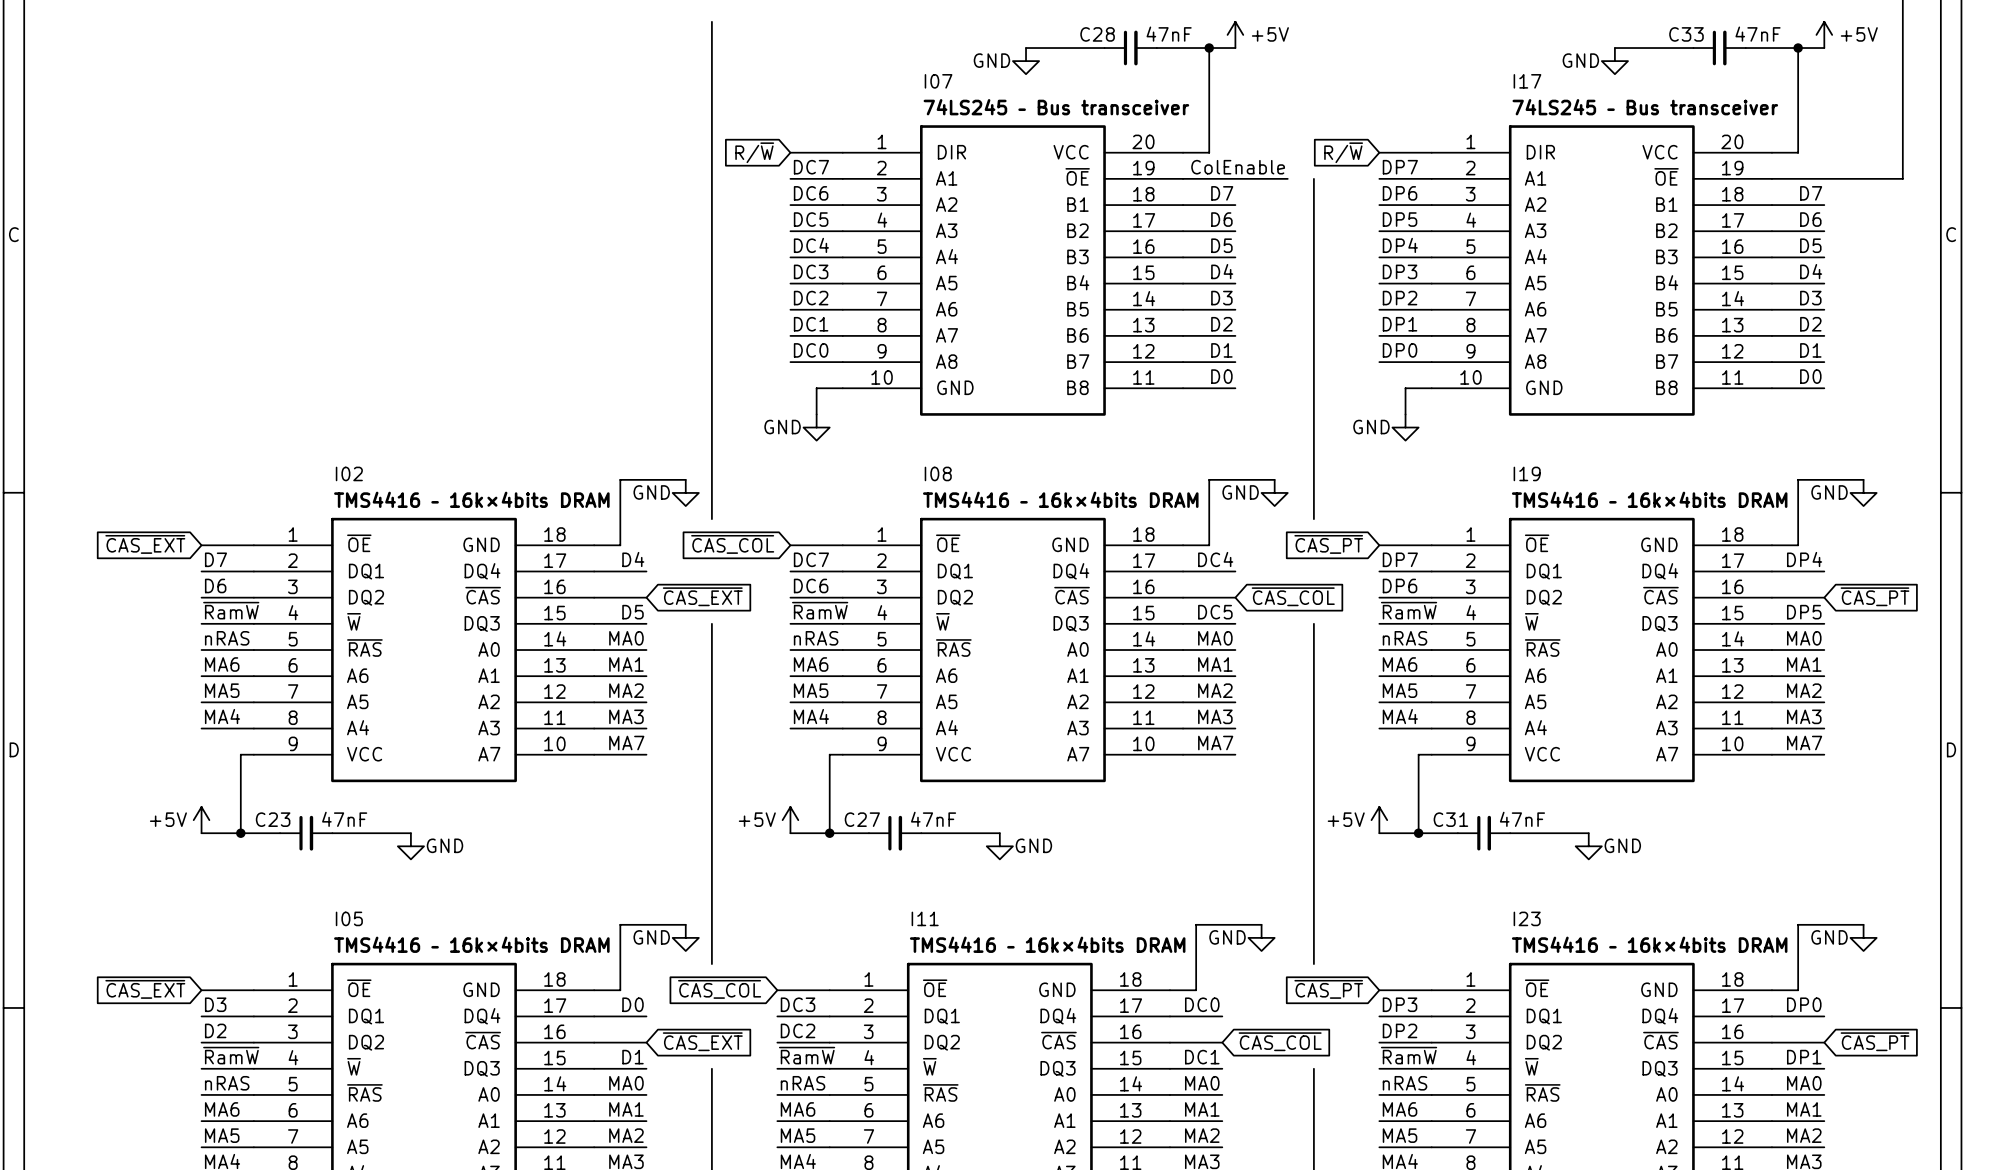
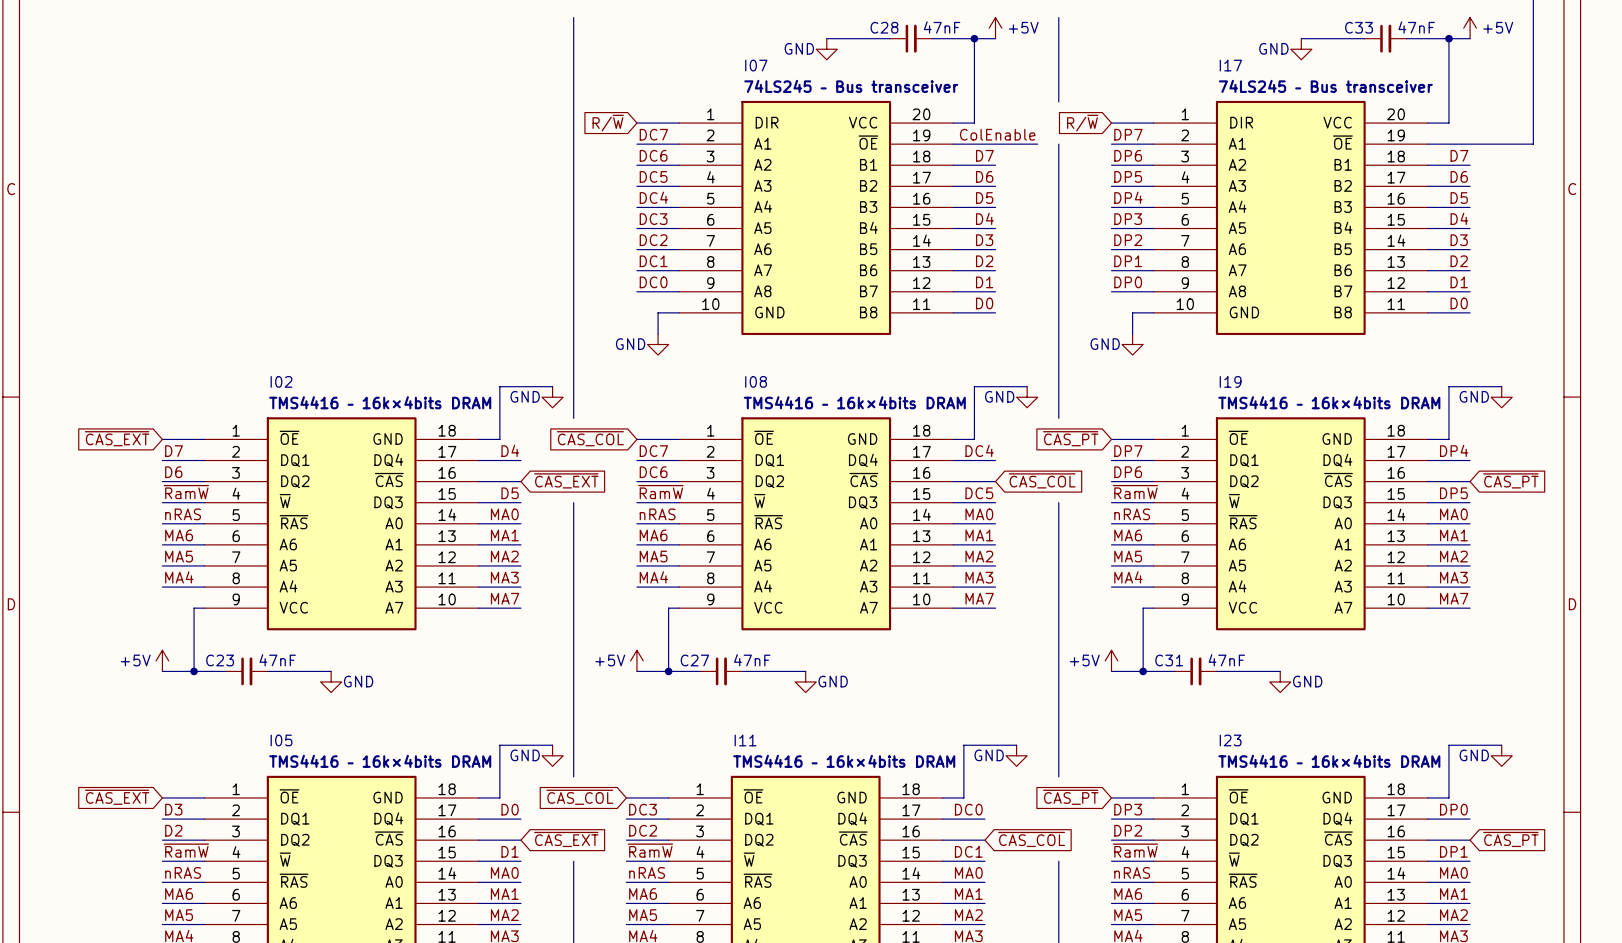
line: none -> (1058, 17) (1058, 101)

